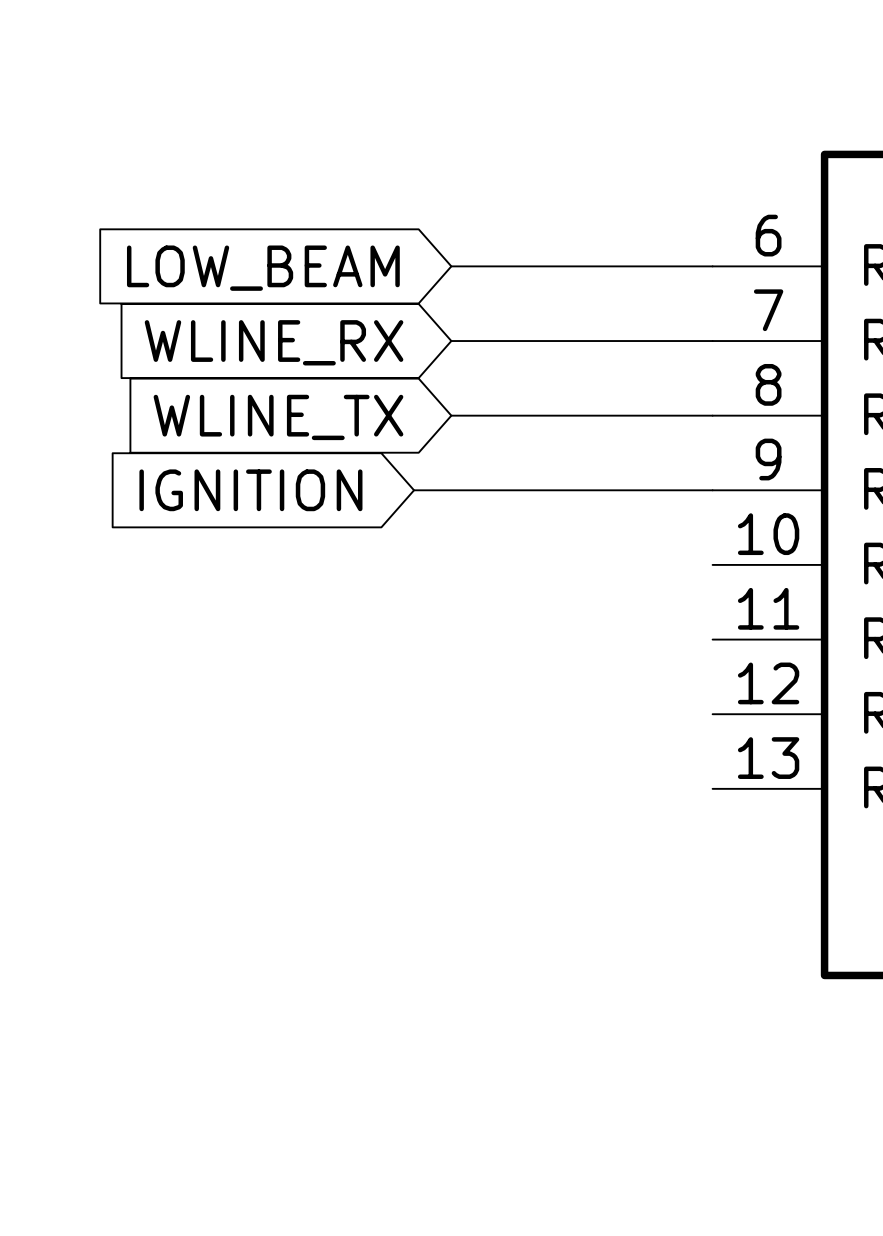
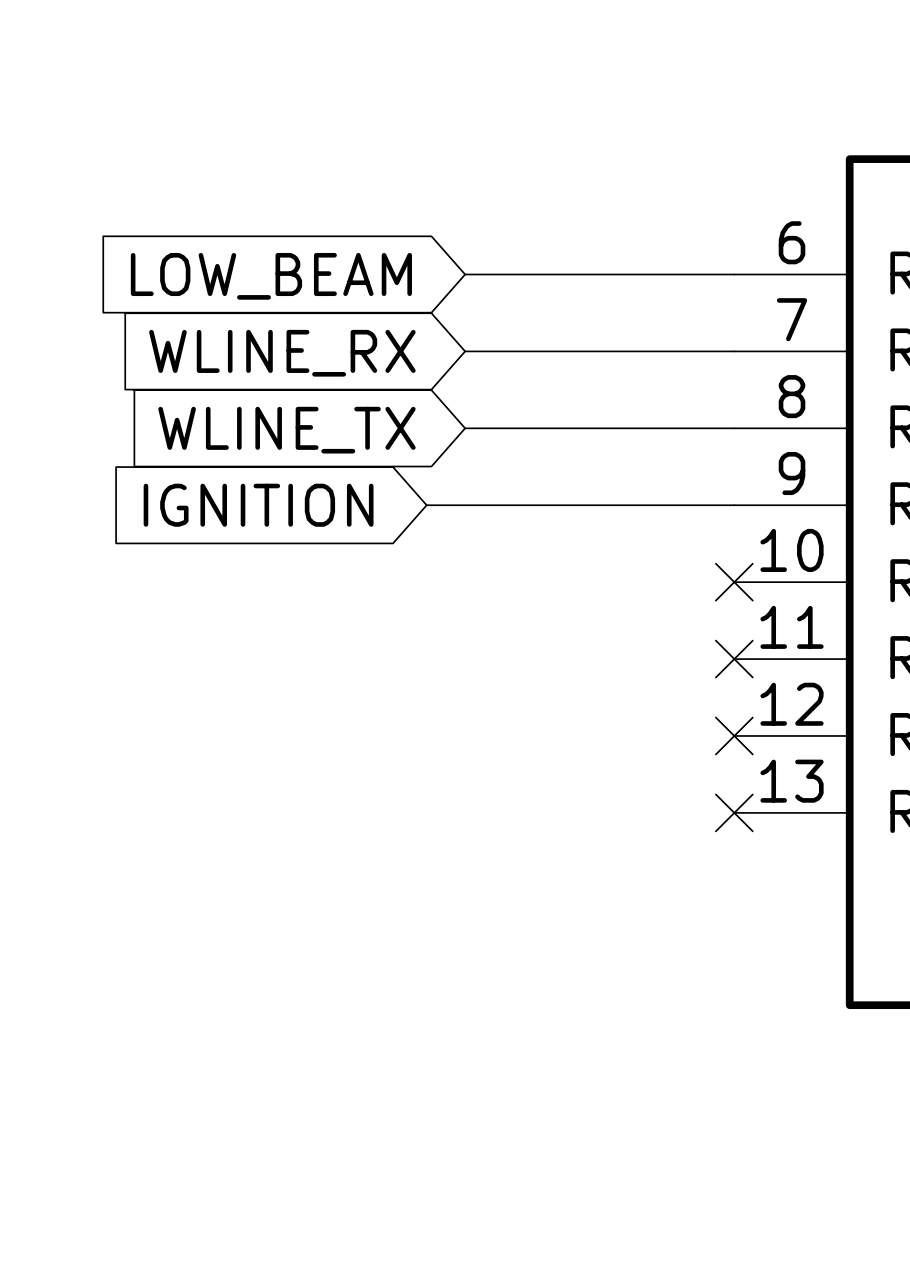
no-connect mark: none -> (734, 582)
no-connect mark: none -> (734, 659)
no-connect mark: none -> (734, 735)
no-connect mark: none -> (734, 812)

